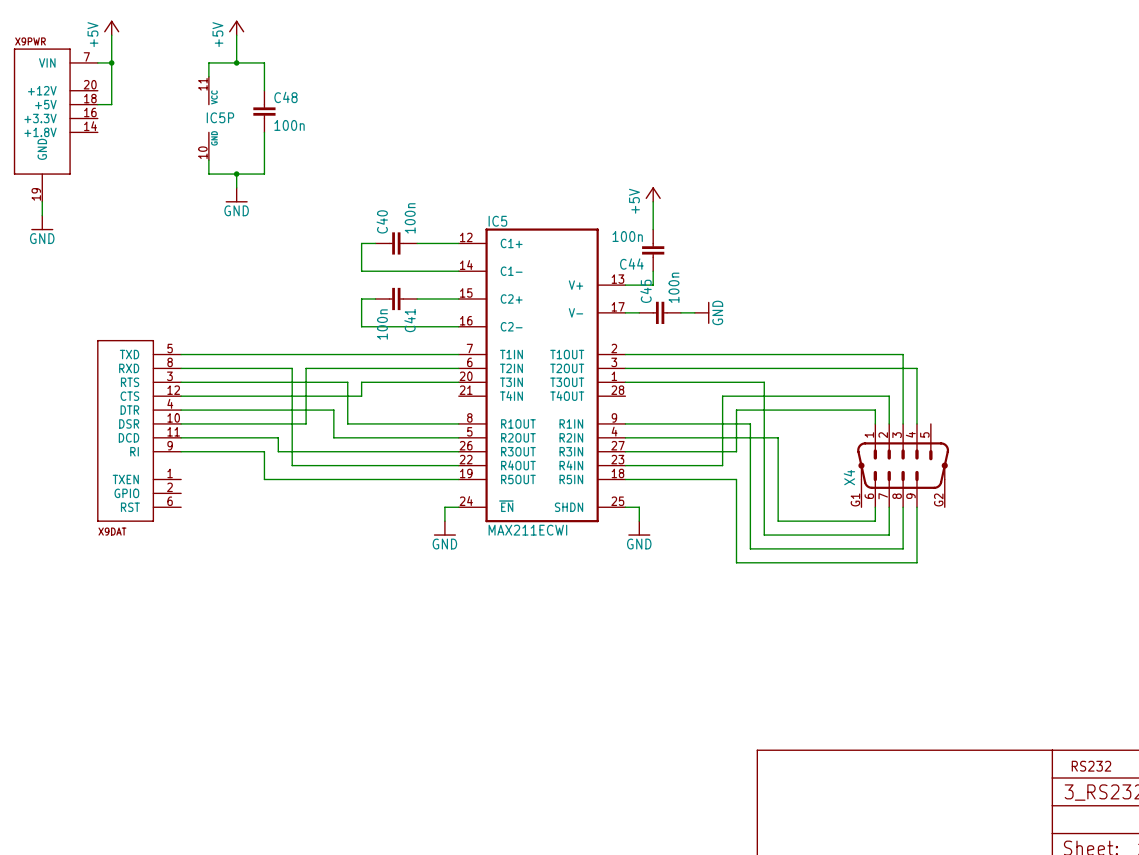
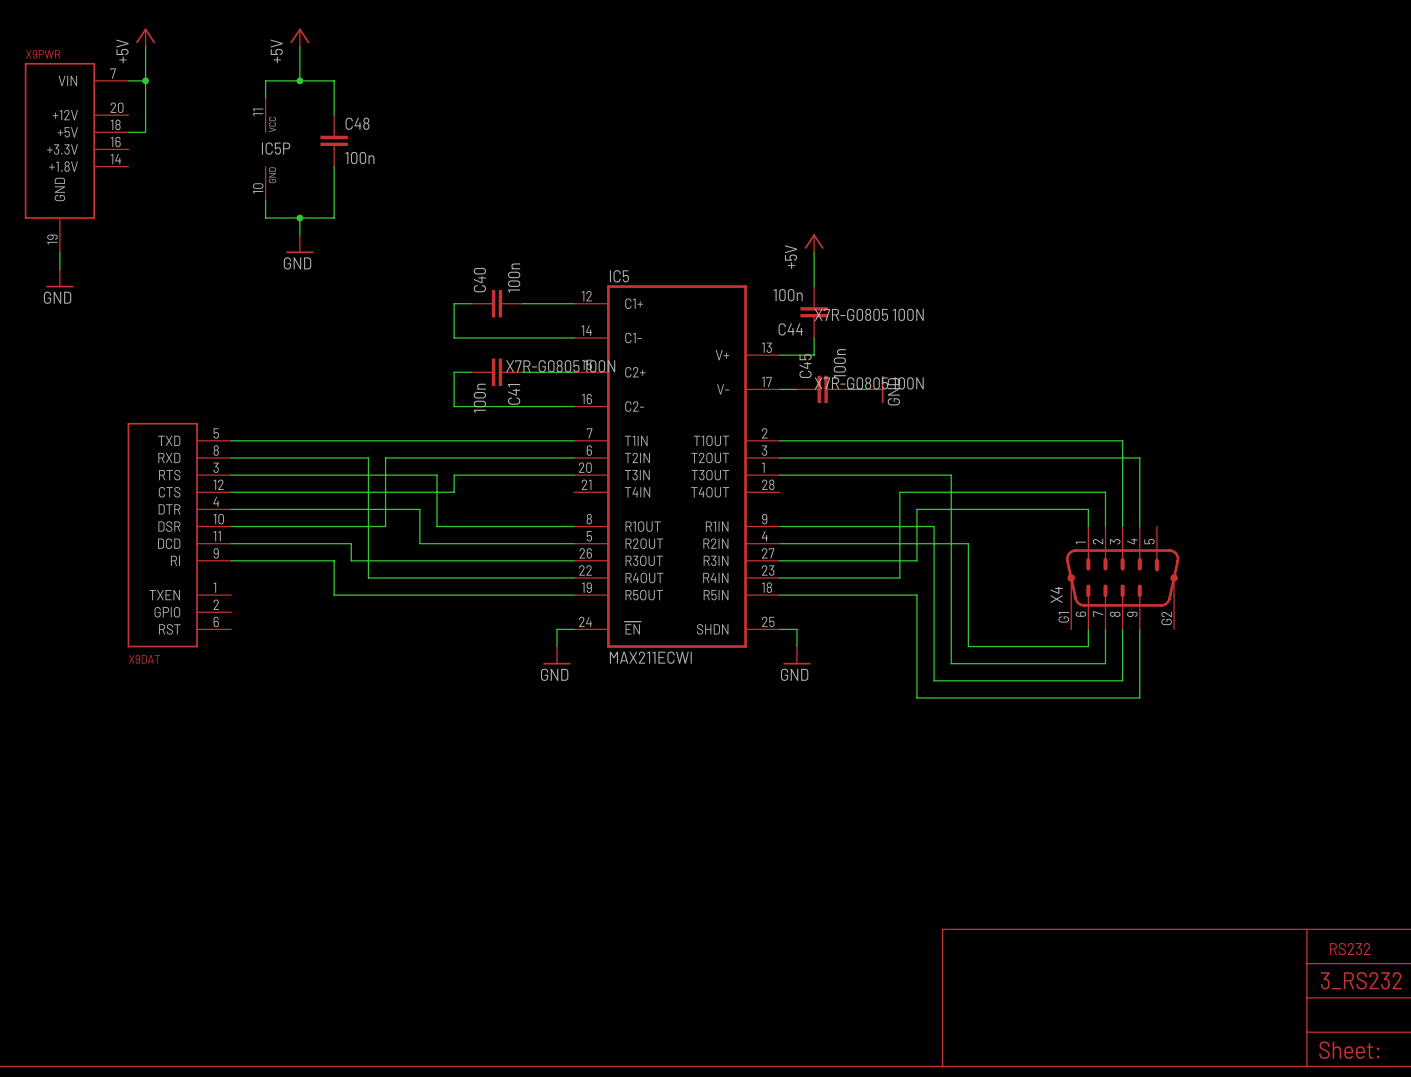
C44 text: none -> X7R-G0805 100N (869, 314)
C41 text: none -> X7R-G0805 100N (560, 366)
C45 text: none -> X7R-G0805 100N (869, 383)

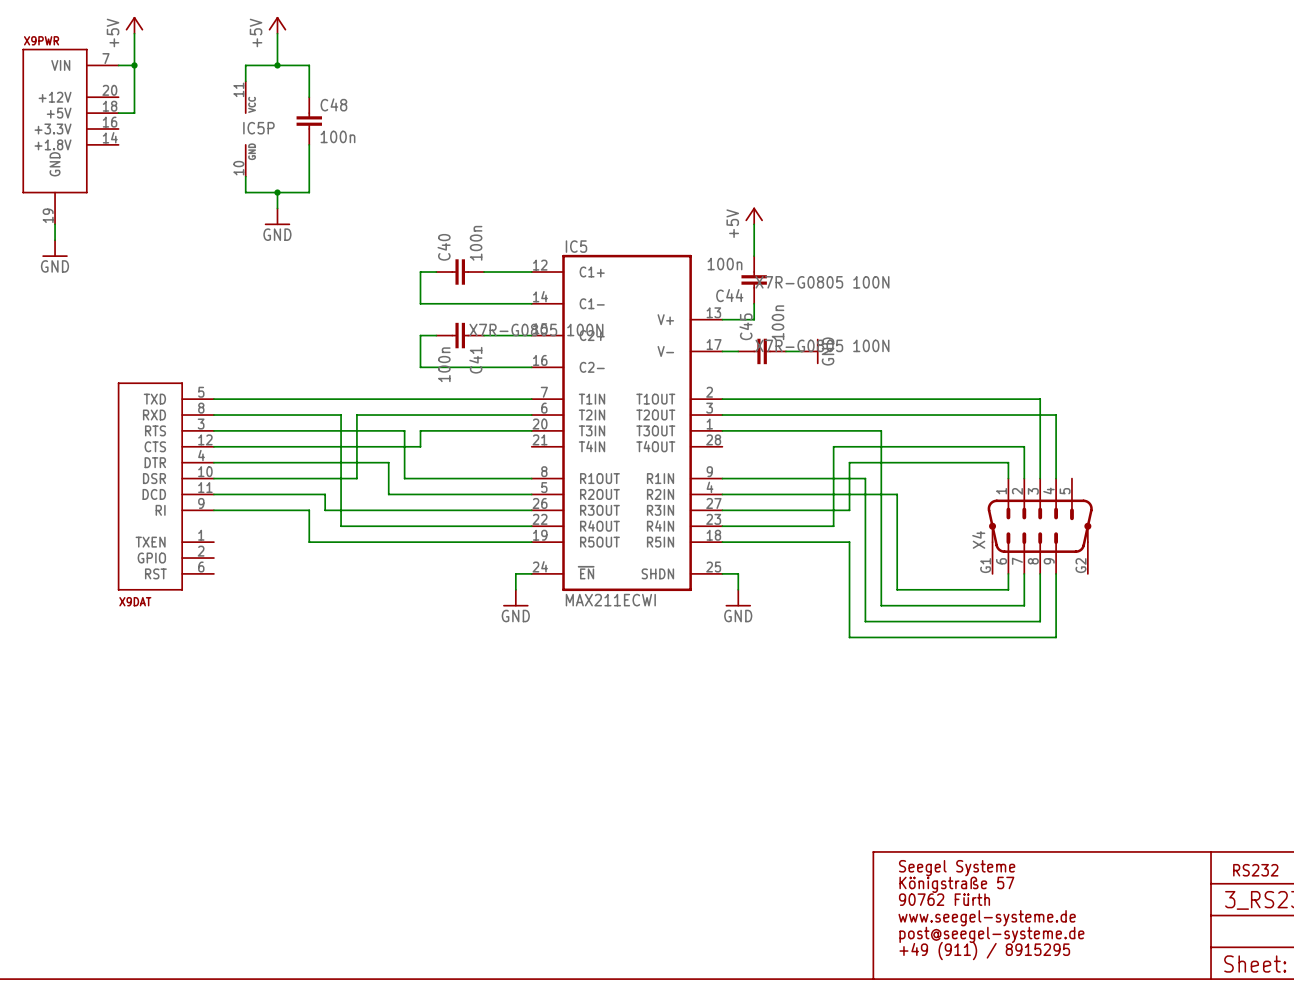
text: none -> Seegel Systeme (957, 868)
text: none -> Königstraße 57 (956, 884)
text: none -> 90762 Fürth (944, 899)
text: none -> www.seegel-systeme.de (987, 918)
text: none -> post@seegel-systeme.de (991, 934)
text: none -> +49 (911) / 8915295 (984, 951)

